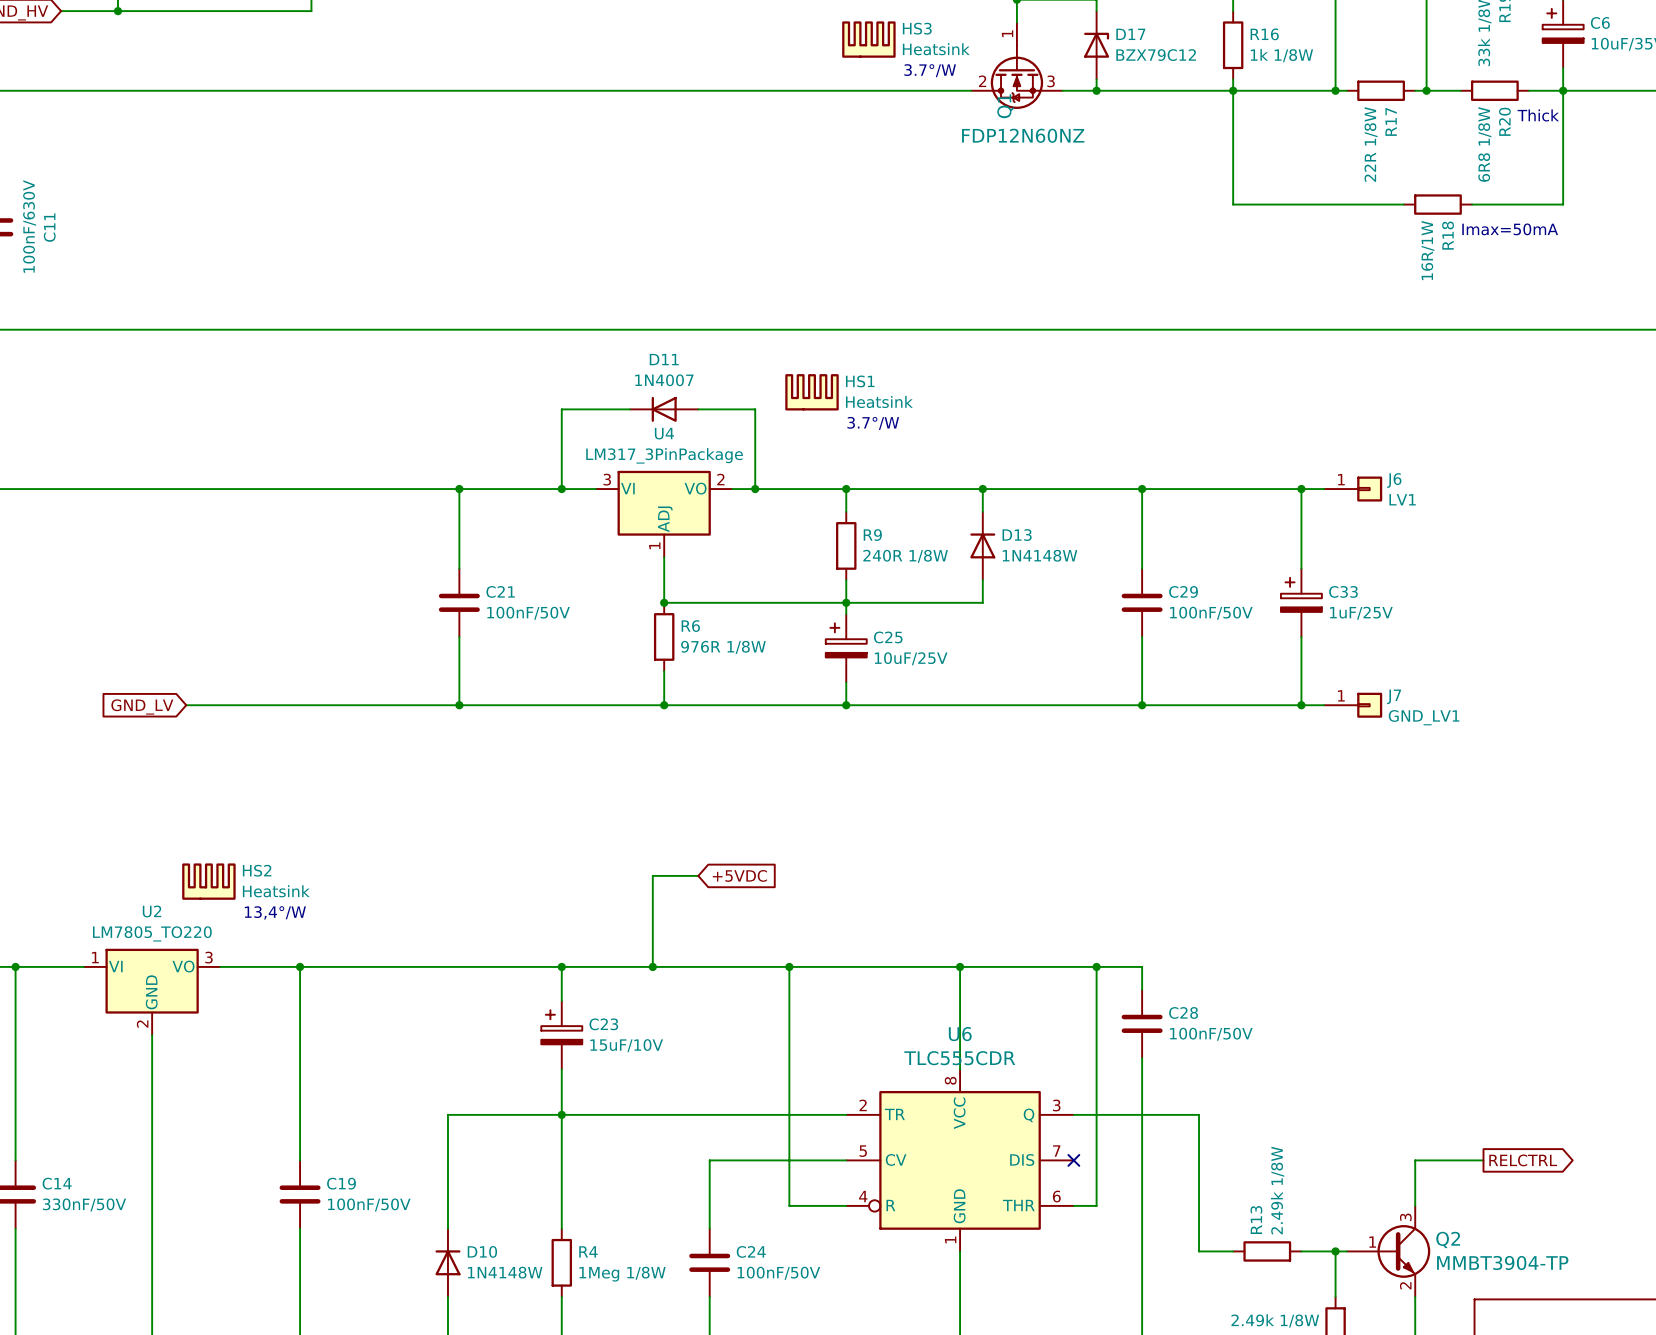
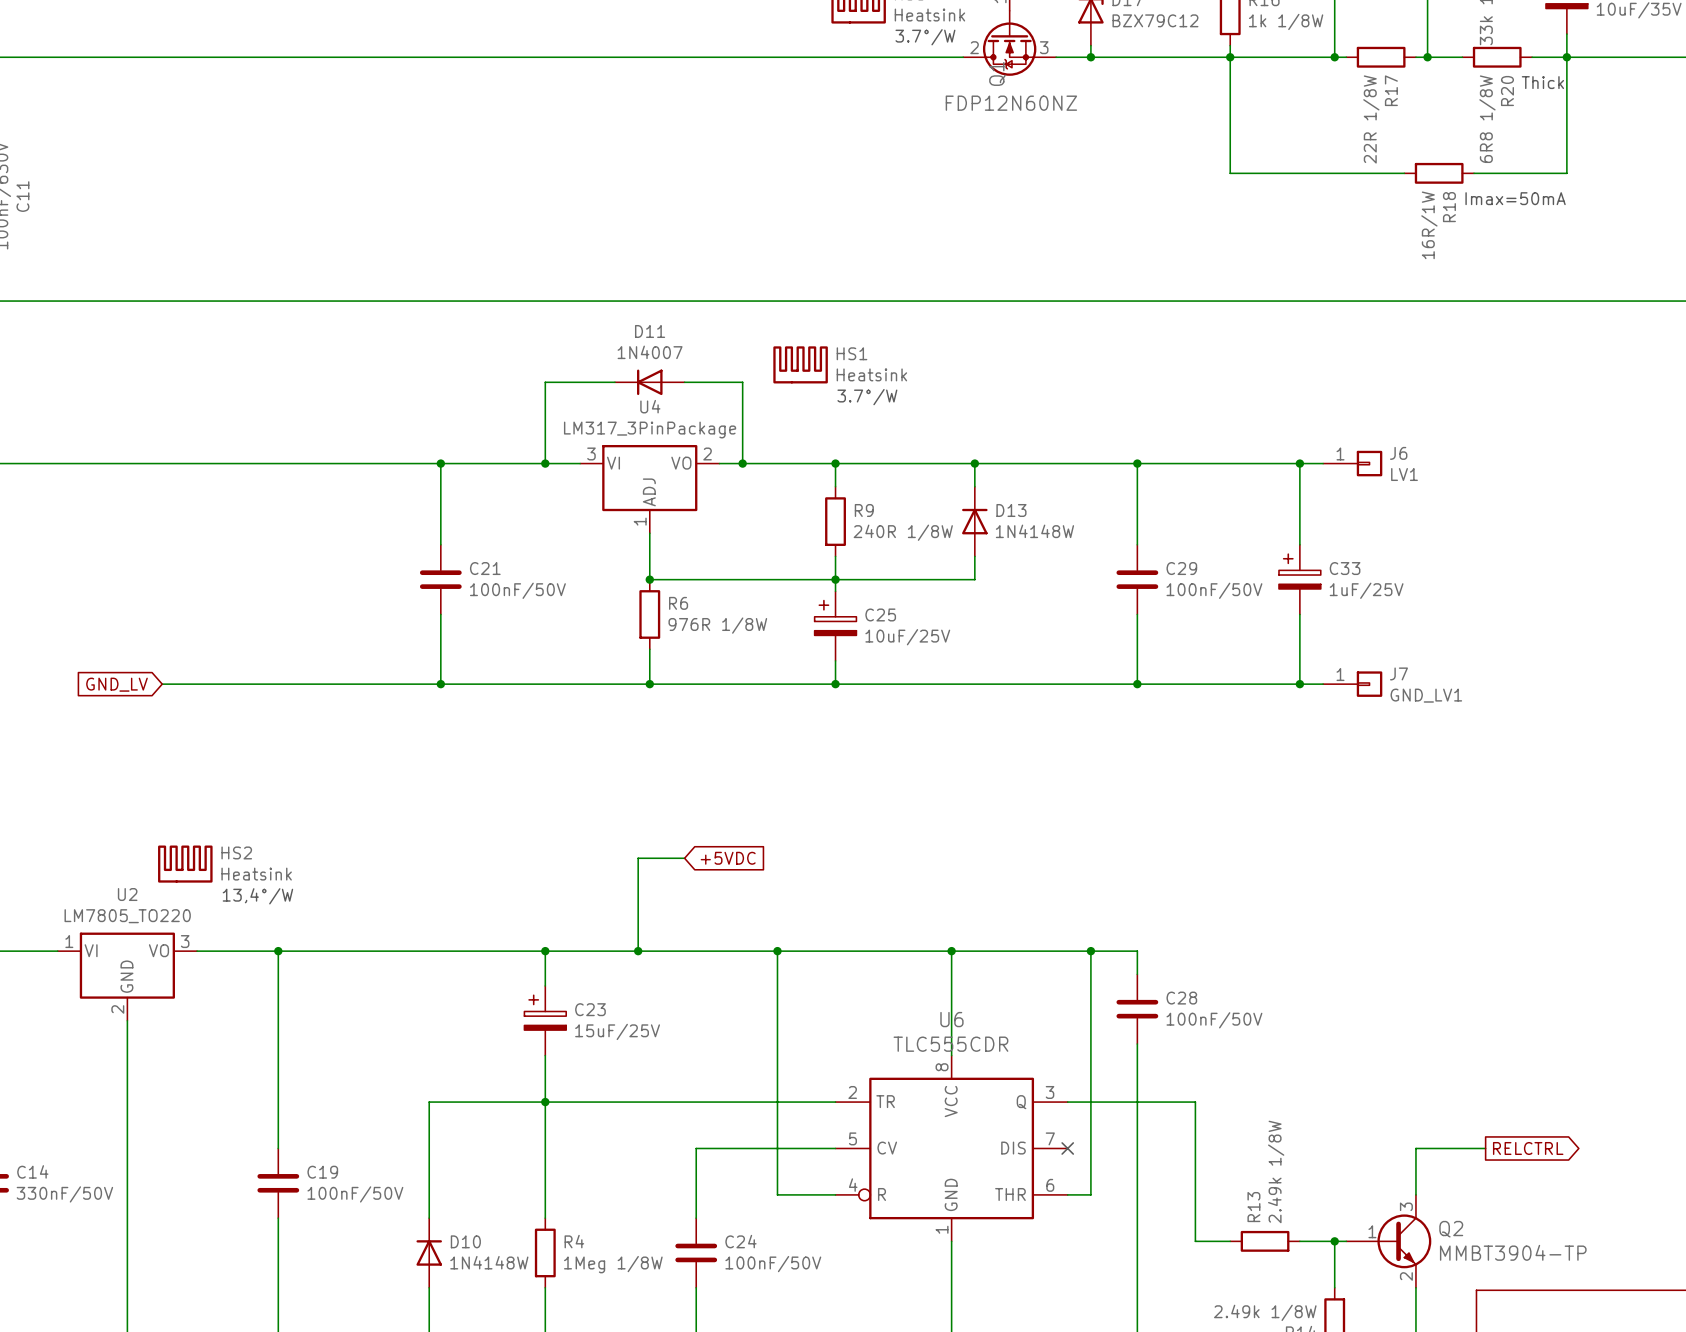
C23 value: 15uF/10V (626, 1045) -> 15uF/25V (617, 1031)

